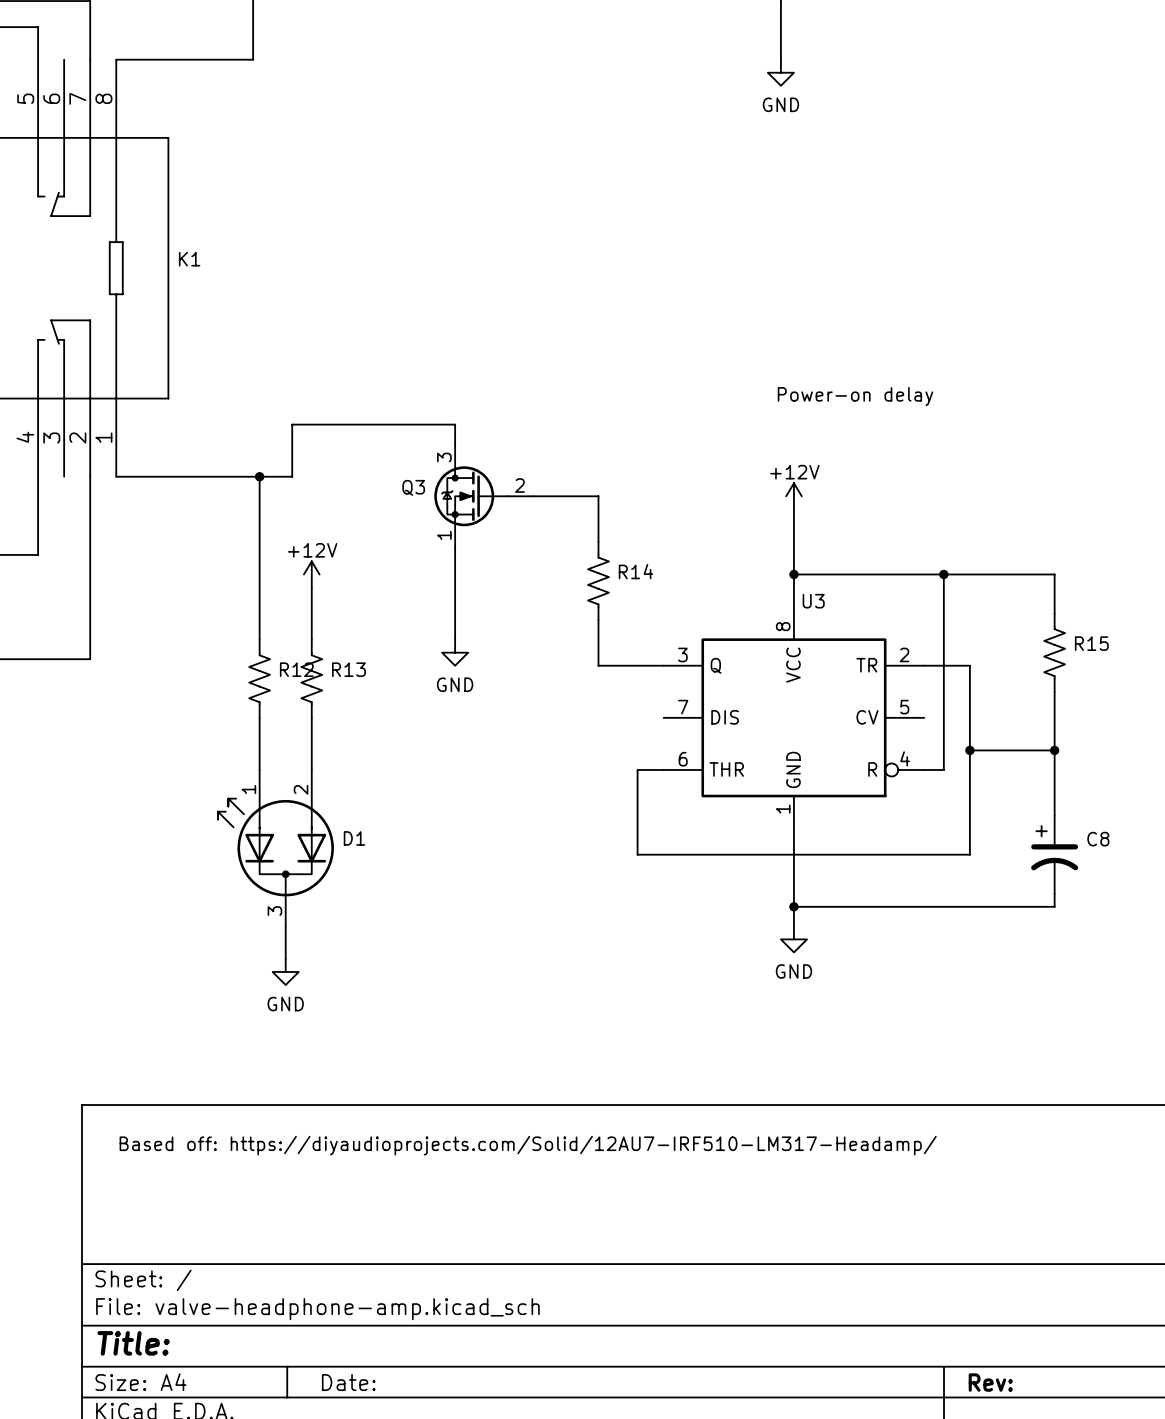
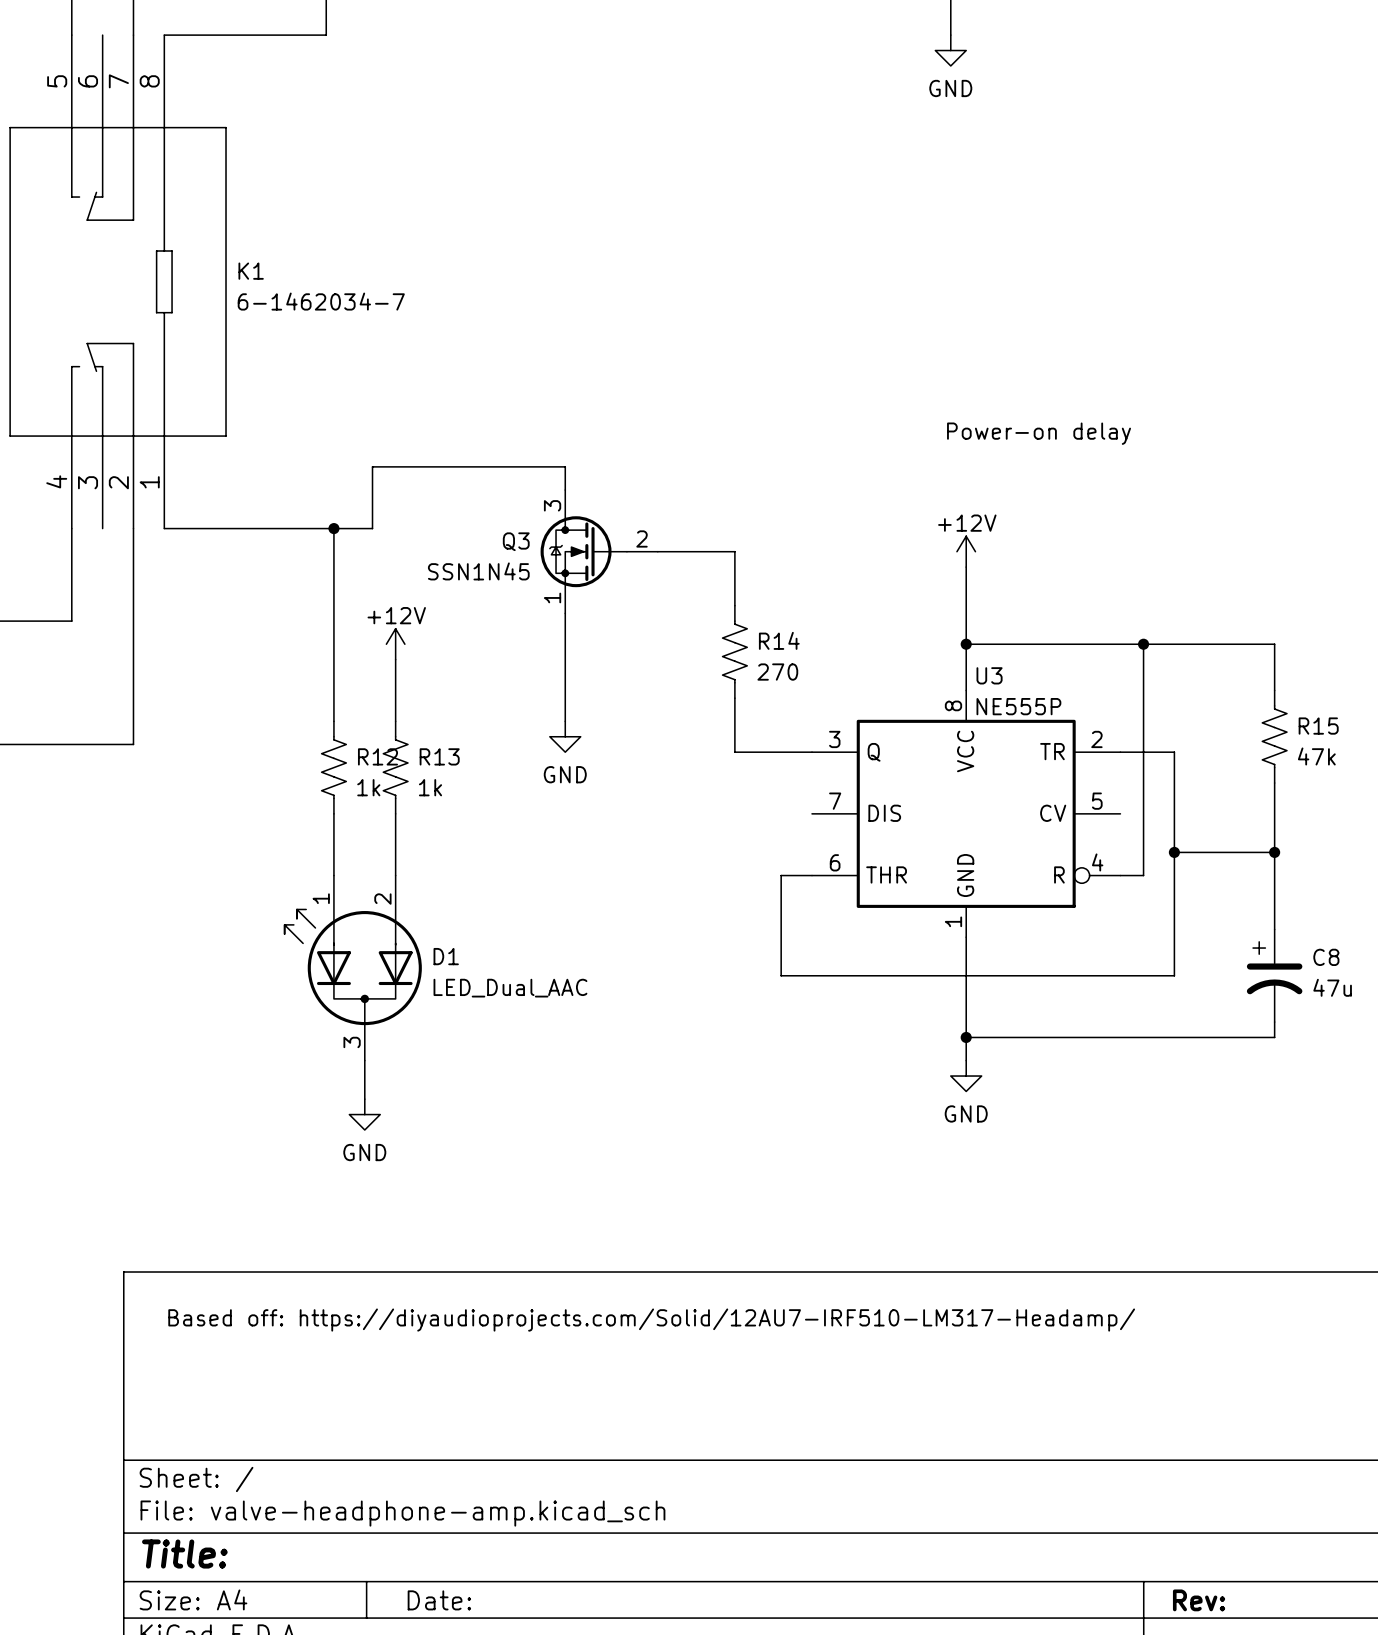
K1 value: none -> 6-1462034-7 (321, 301)
Q3 value: none -> SSN1N45 (478, 571)
R14 value: none -> 270 (777, 672)
U3 value: none -> NE555P (1018, 706)
R15 value: none -> 47k (1316, 756)
R12 value: none -> 1k (368, 787)
R13 value: none -> 1k (430, 787)
C8 value: none -> 47u (1332, 987)
D1 value: none -> LED_Dual_AAC (510, 988)

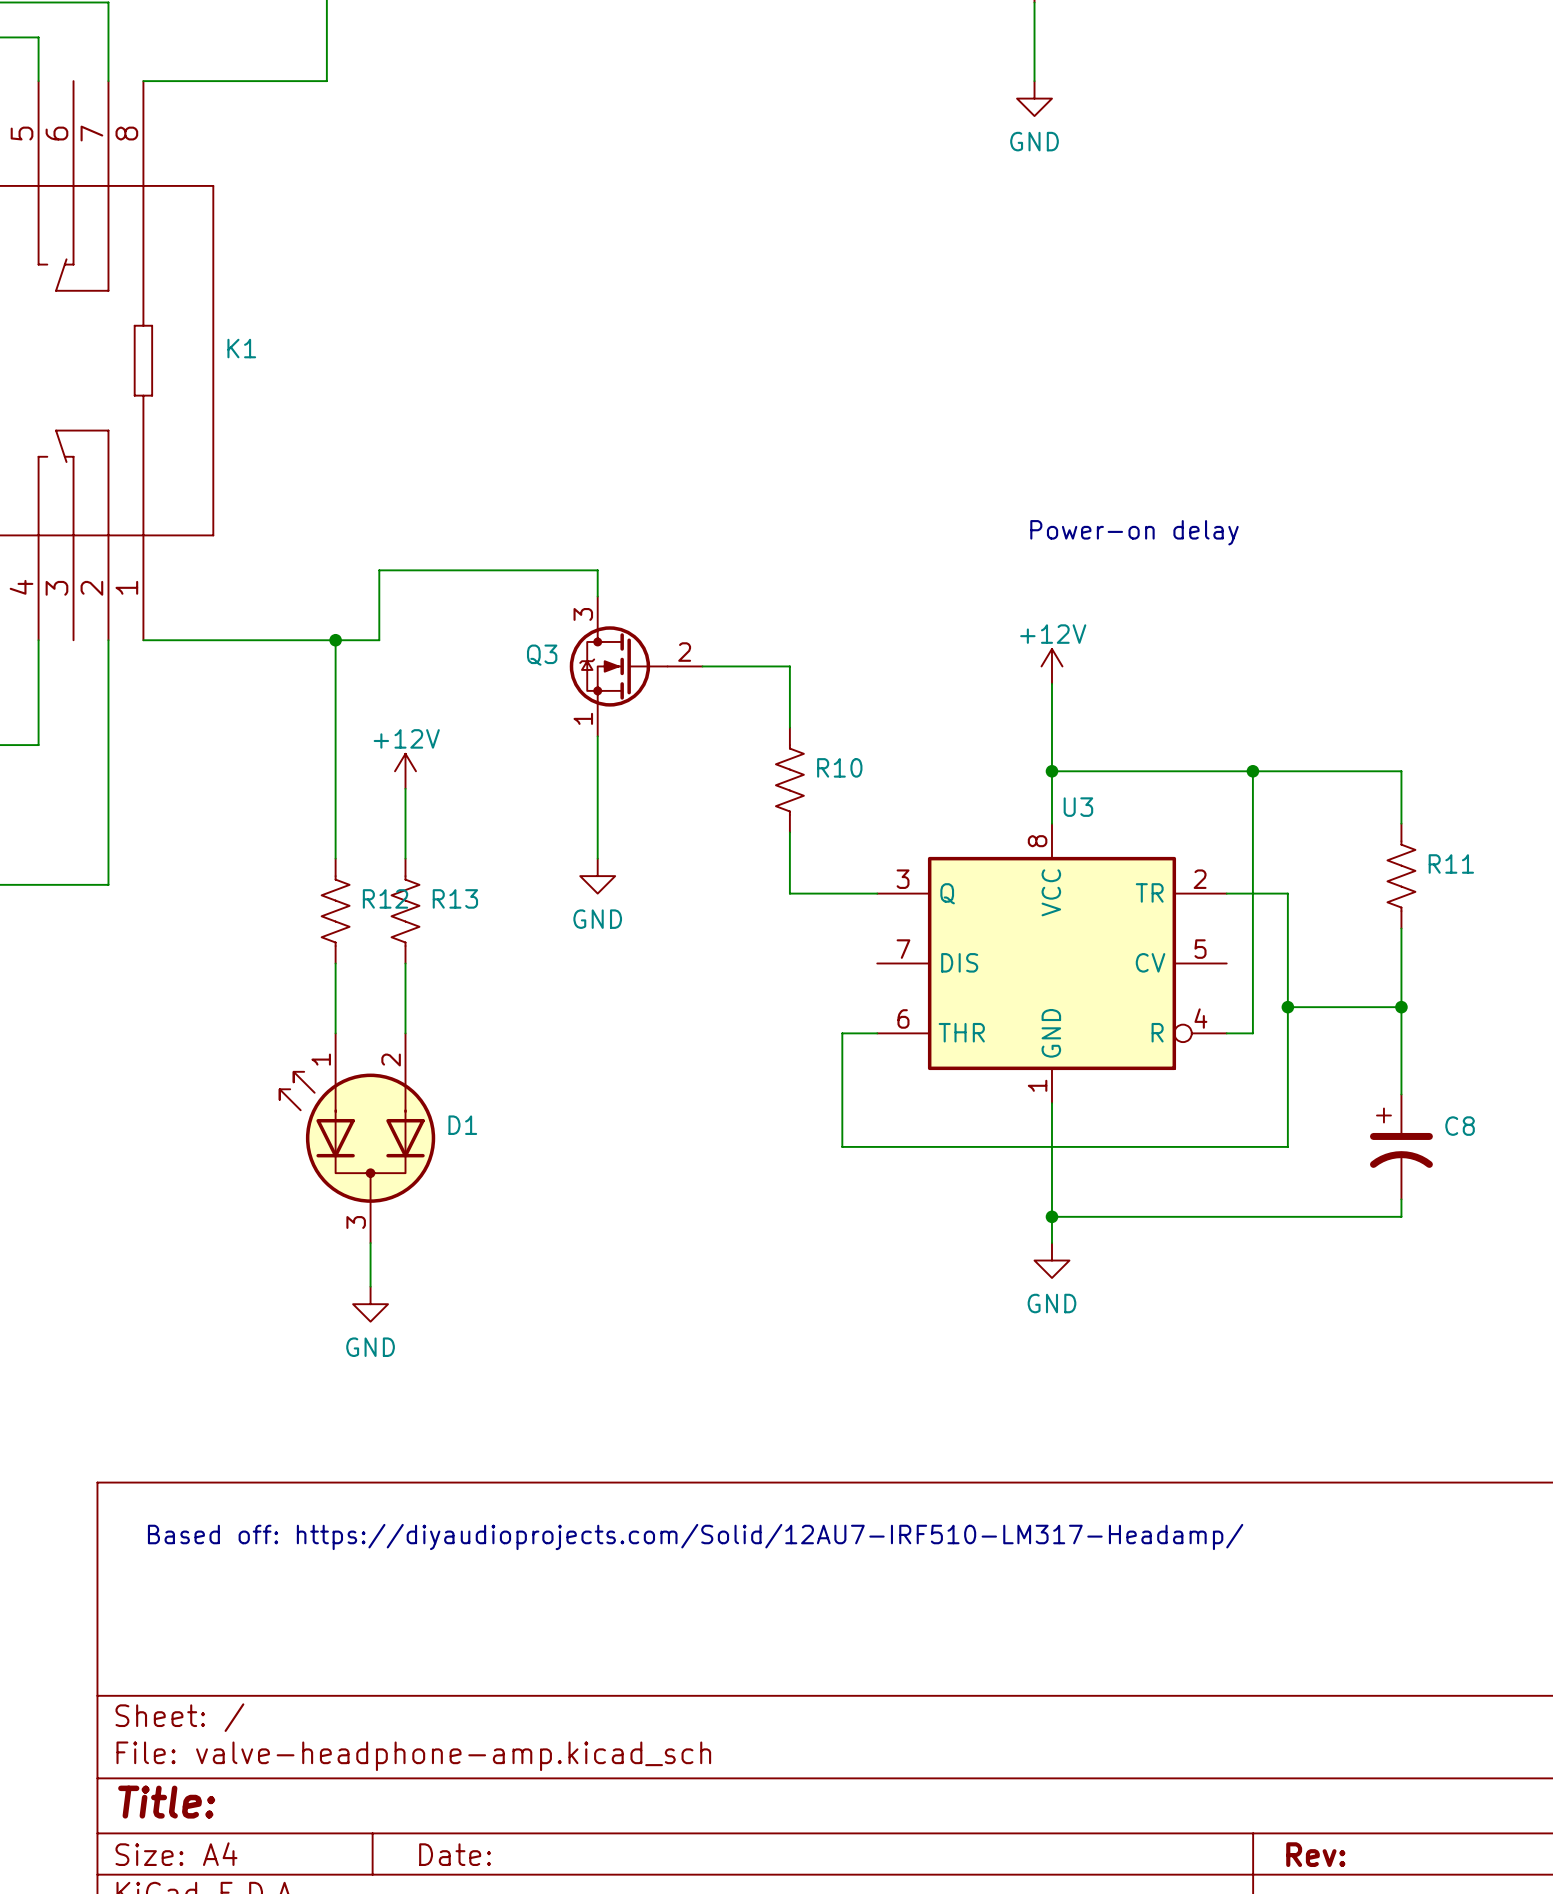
K1 value: 6-1462034-7 (321, 301) -> none
Q3 value: SSN1N45 (478, 571) -> none
R14 name: R14 (779, 640) -> R10 (839, 767)
R14 value: 270 (777, 672) -> none
U3 value: NE555P (1018, 706) -> none
R15 name: R15 (1318, 726) -> R11 (1451, 863)
R15 value: 47k (1316, 756) -> none
R12 value: 1k (368, 787) -> none
R13 value: 1k (430, 787) -> none
C8 value: 47u (1332, 987) -> none
D1 value: LED_Dual_AAC (510, 988) -> none

